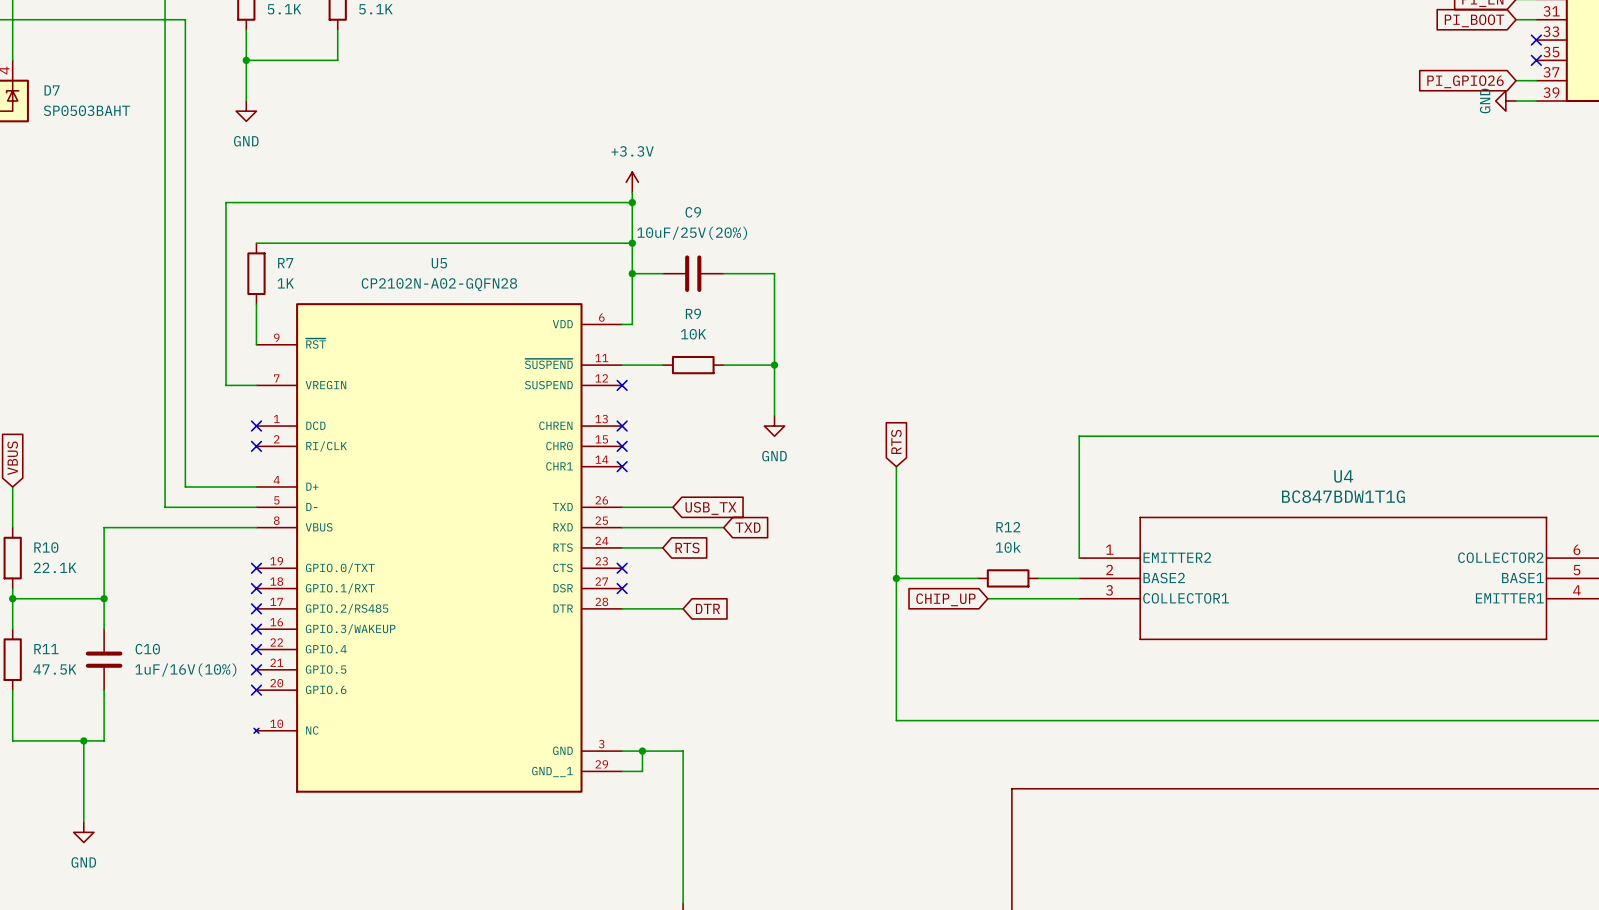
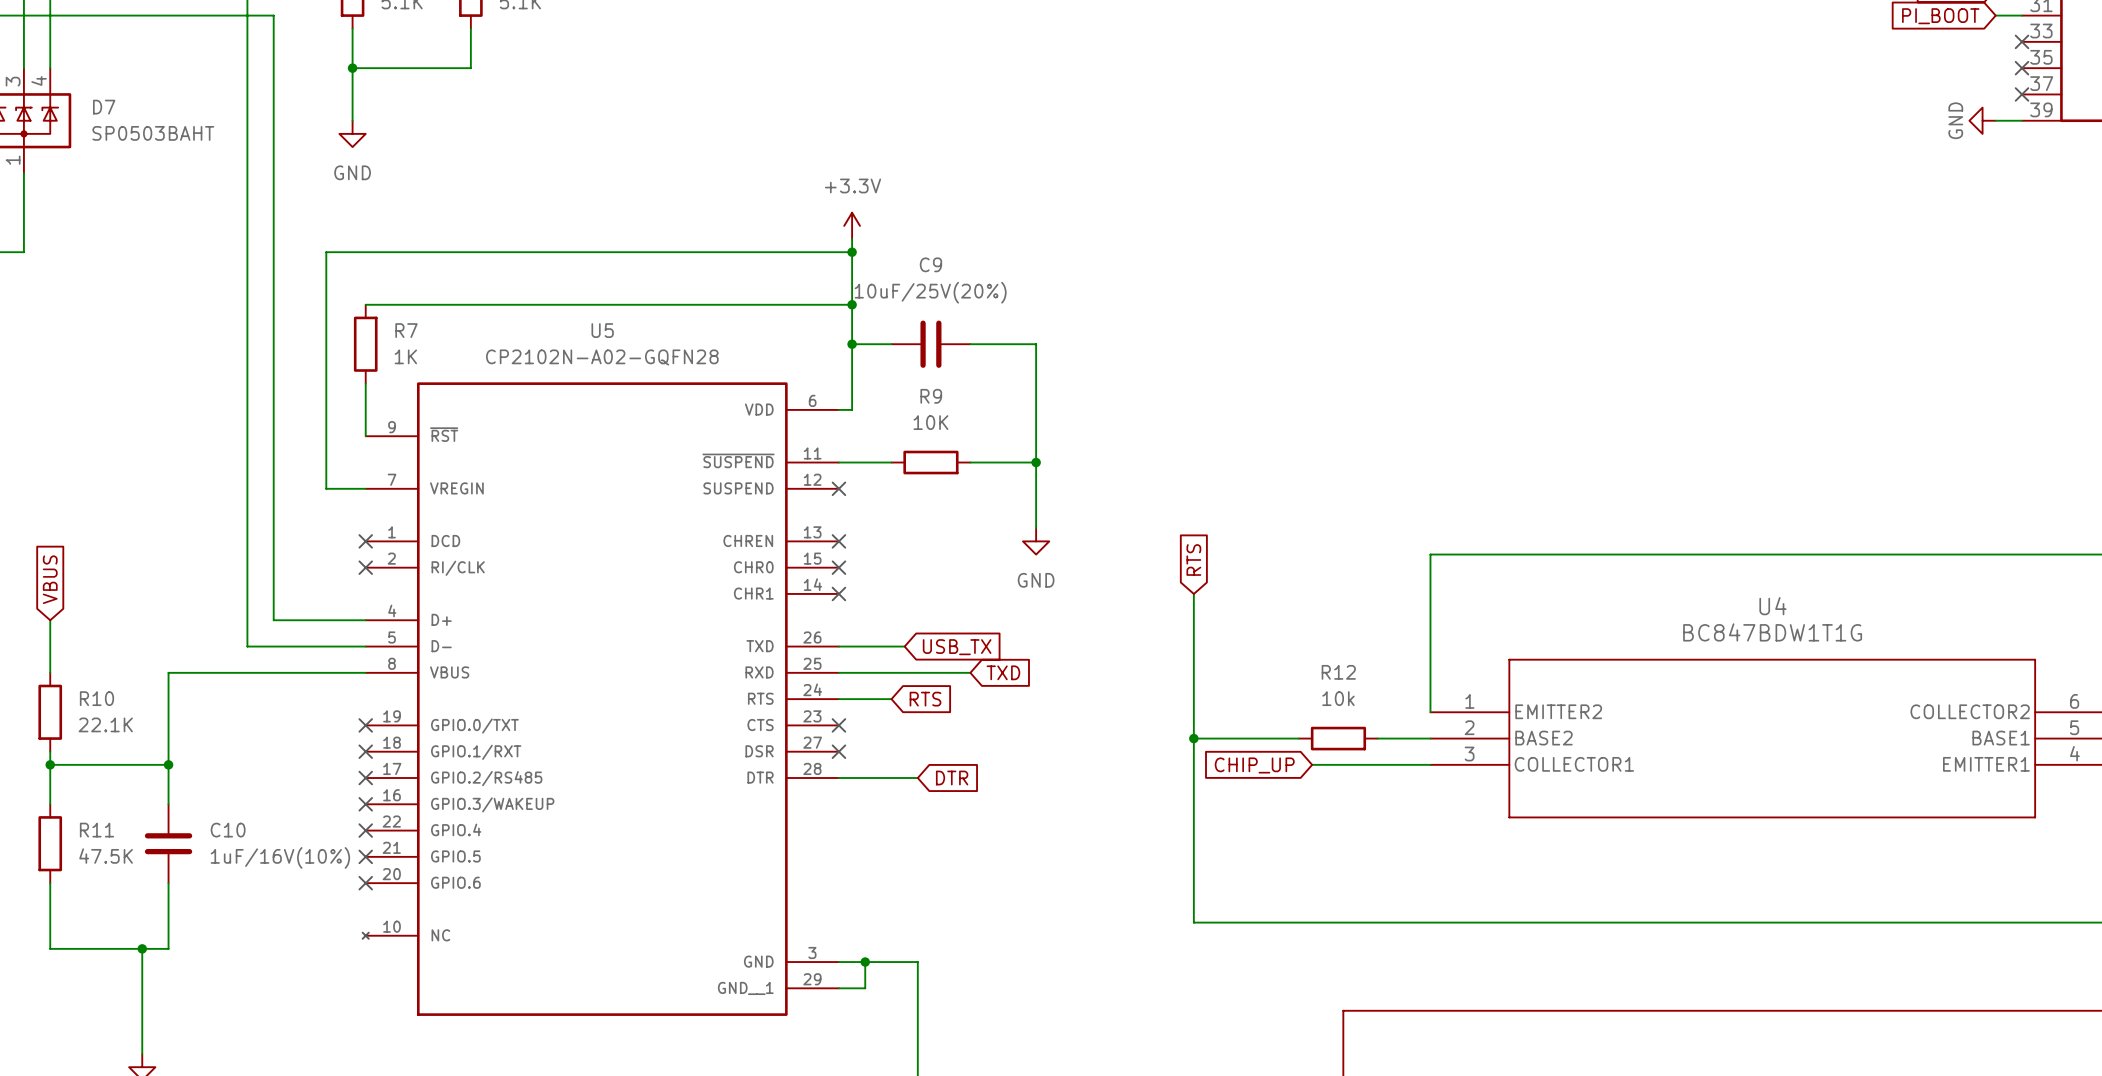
wire: (1516, 80) (1536, 80) -> none
no-connect mark: none -> (2022, 94)
global label: PI_GPIO26 (1465, 81) -> none

